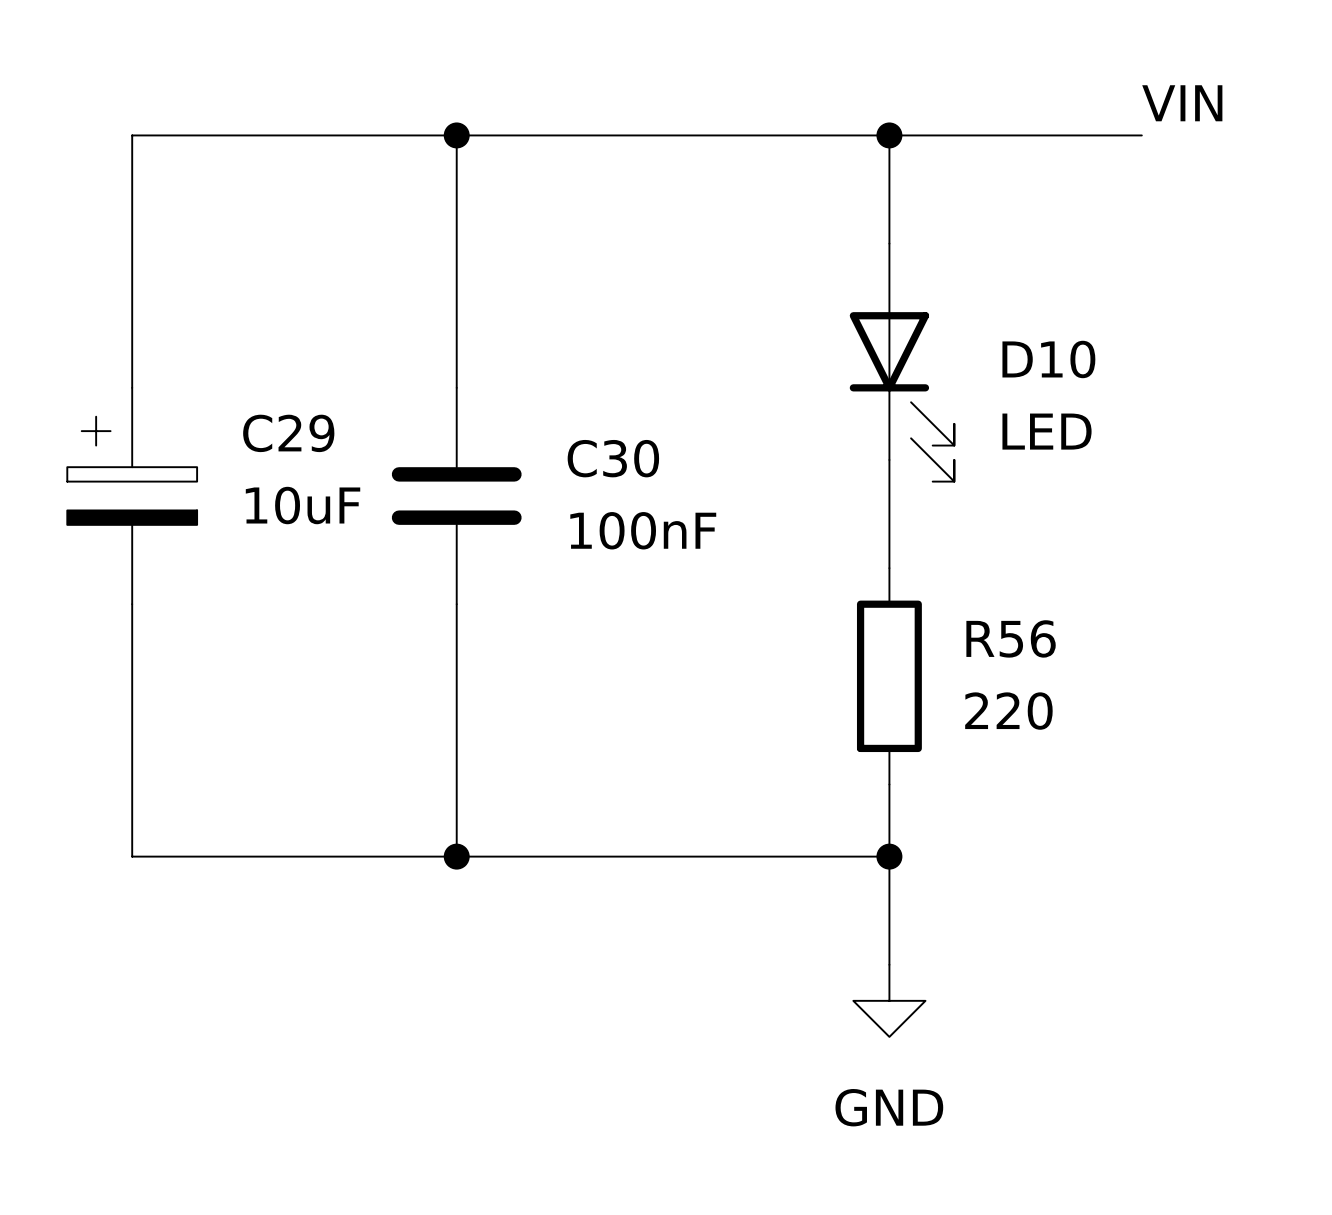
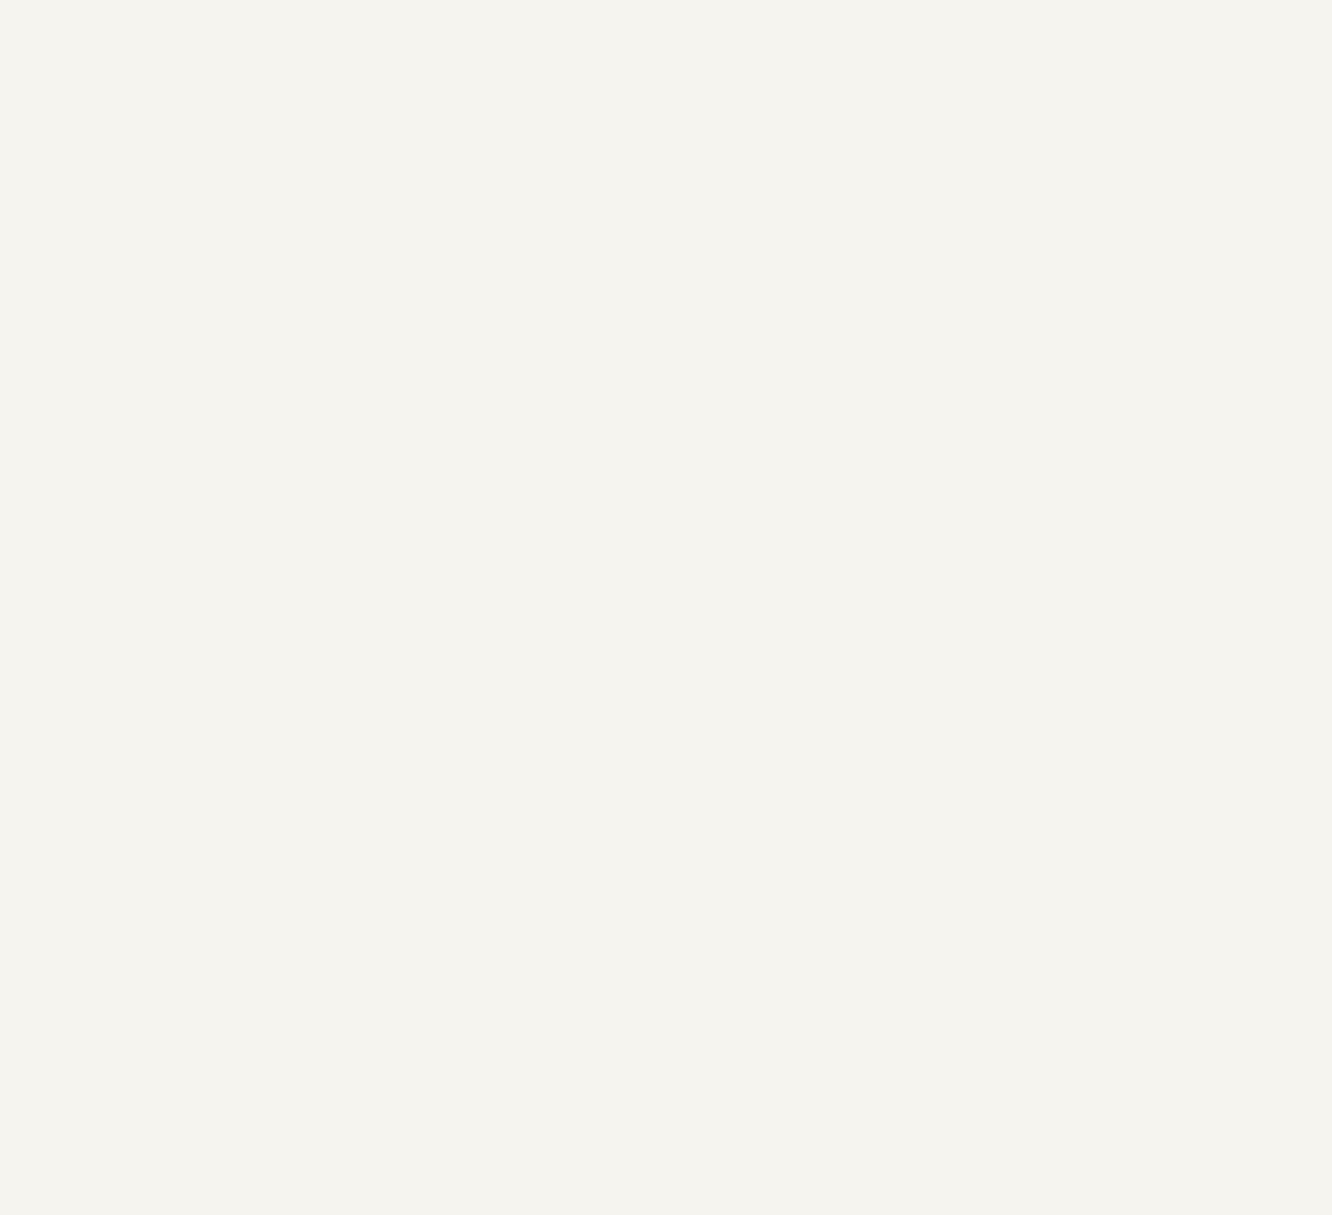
label: VIN (1182, 103) -> none
wire: (456, 135) (456, 387) -> none
junction: (456, 135) -> none
wire: (889, 135) (889, 243) -> none
junction: (889, 135) -> none
wire: (1141, 135) (132, 135) (132, 387) -> none
D10: LED (902, 362) -> none
wire: (889, 459) (889, 568) -> none
C29: 10uF (132, 496) -> none
C30: 100nF (456, 496) -> none
wire: (132, 604) (132, 856) (889, 856) -> none
wire: (456, 604) (456, 856) -> none
R56: 220 (889, 676) -> none
wire: (889, 784) (889, 964) -> none
junction: (456, 856) -> none
junction: (889, 856) -> none
power symbol: GND (889, 1000) -> none

